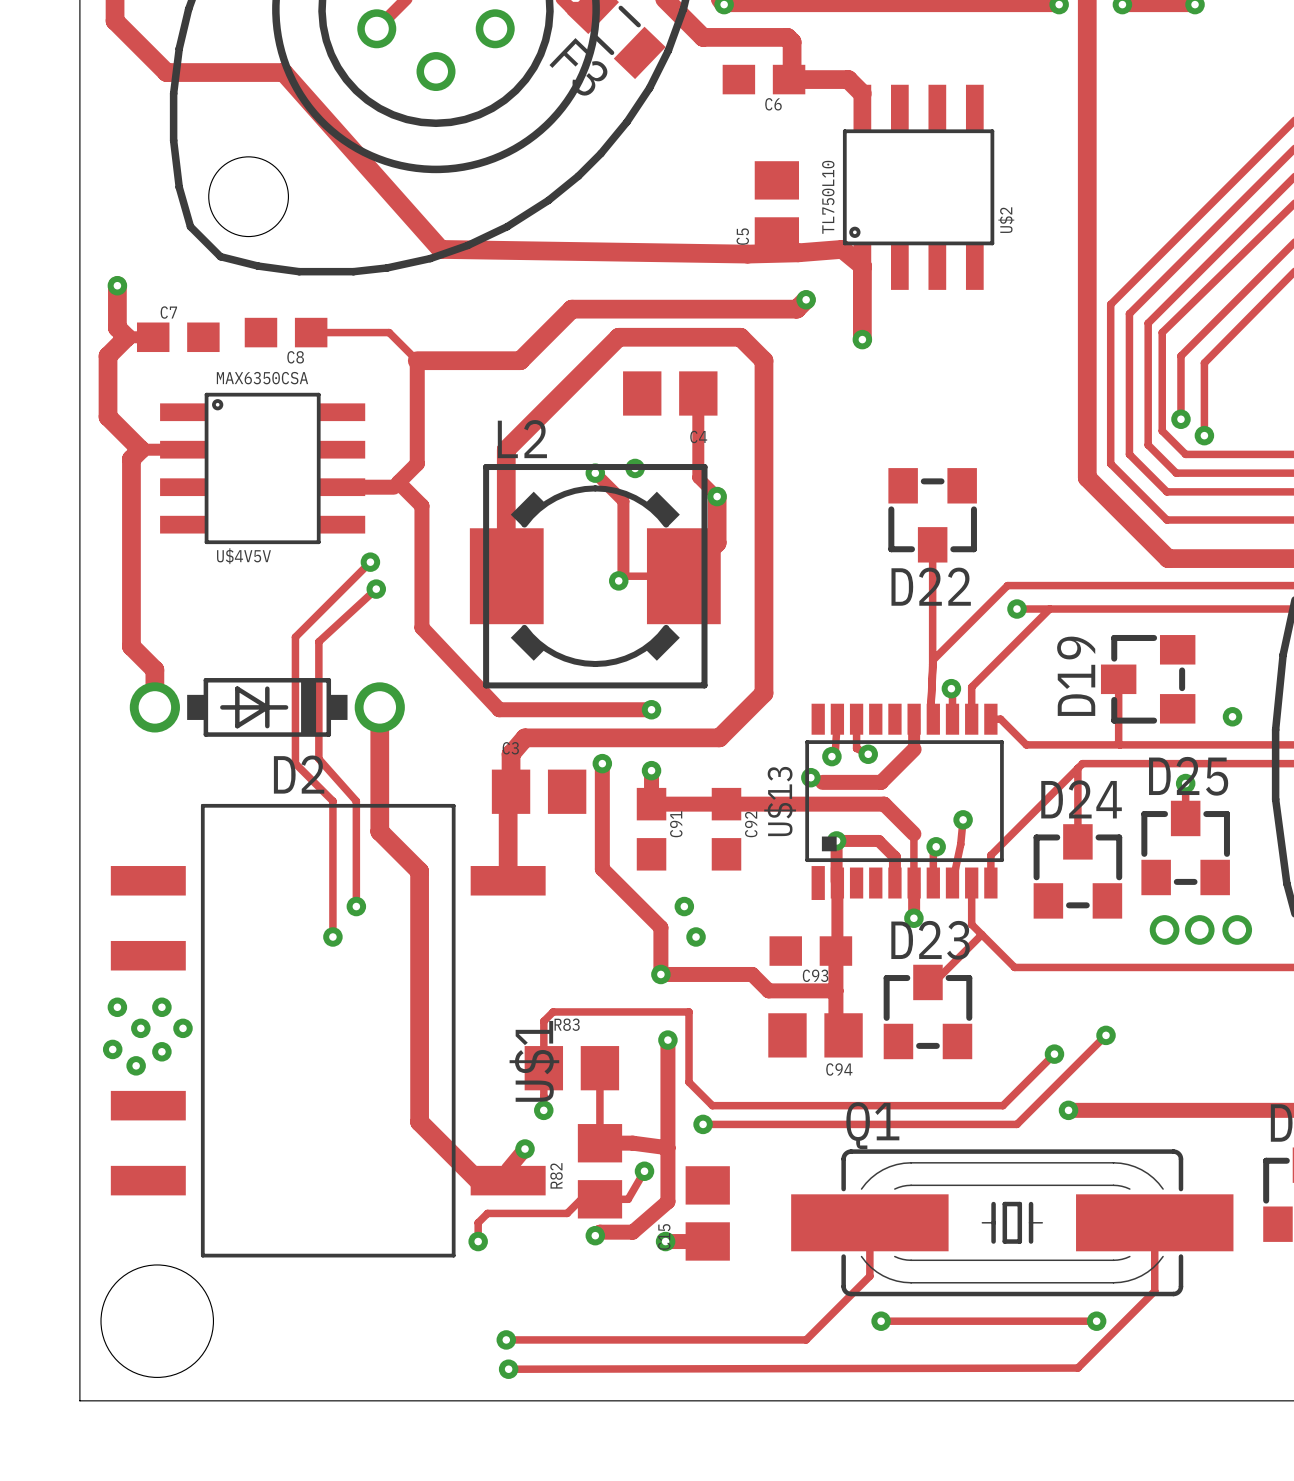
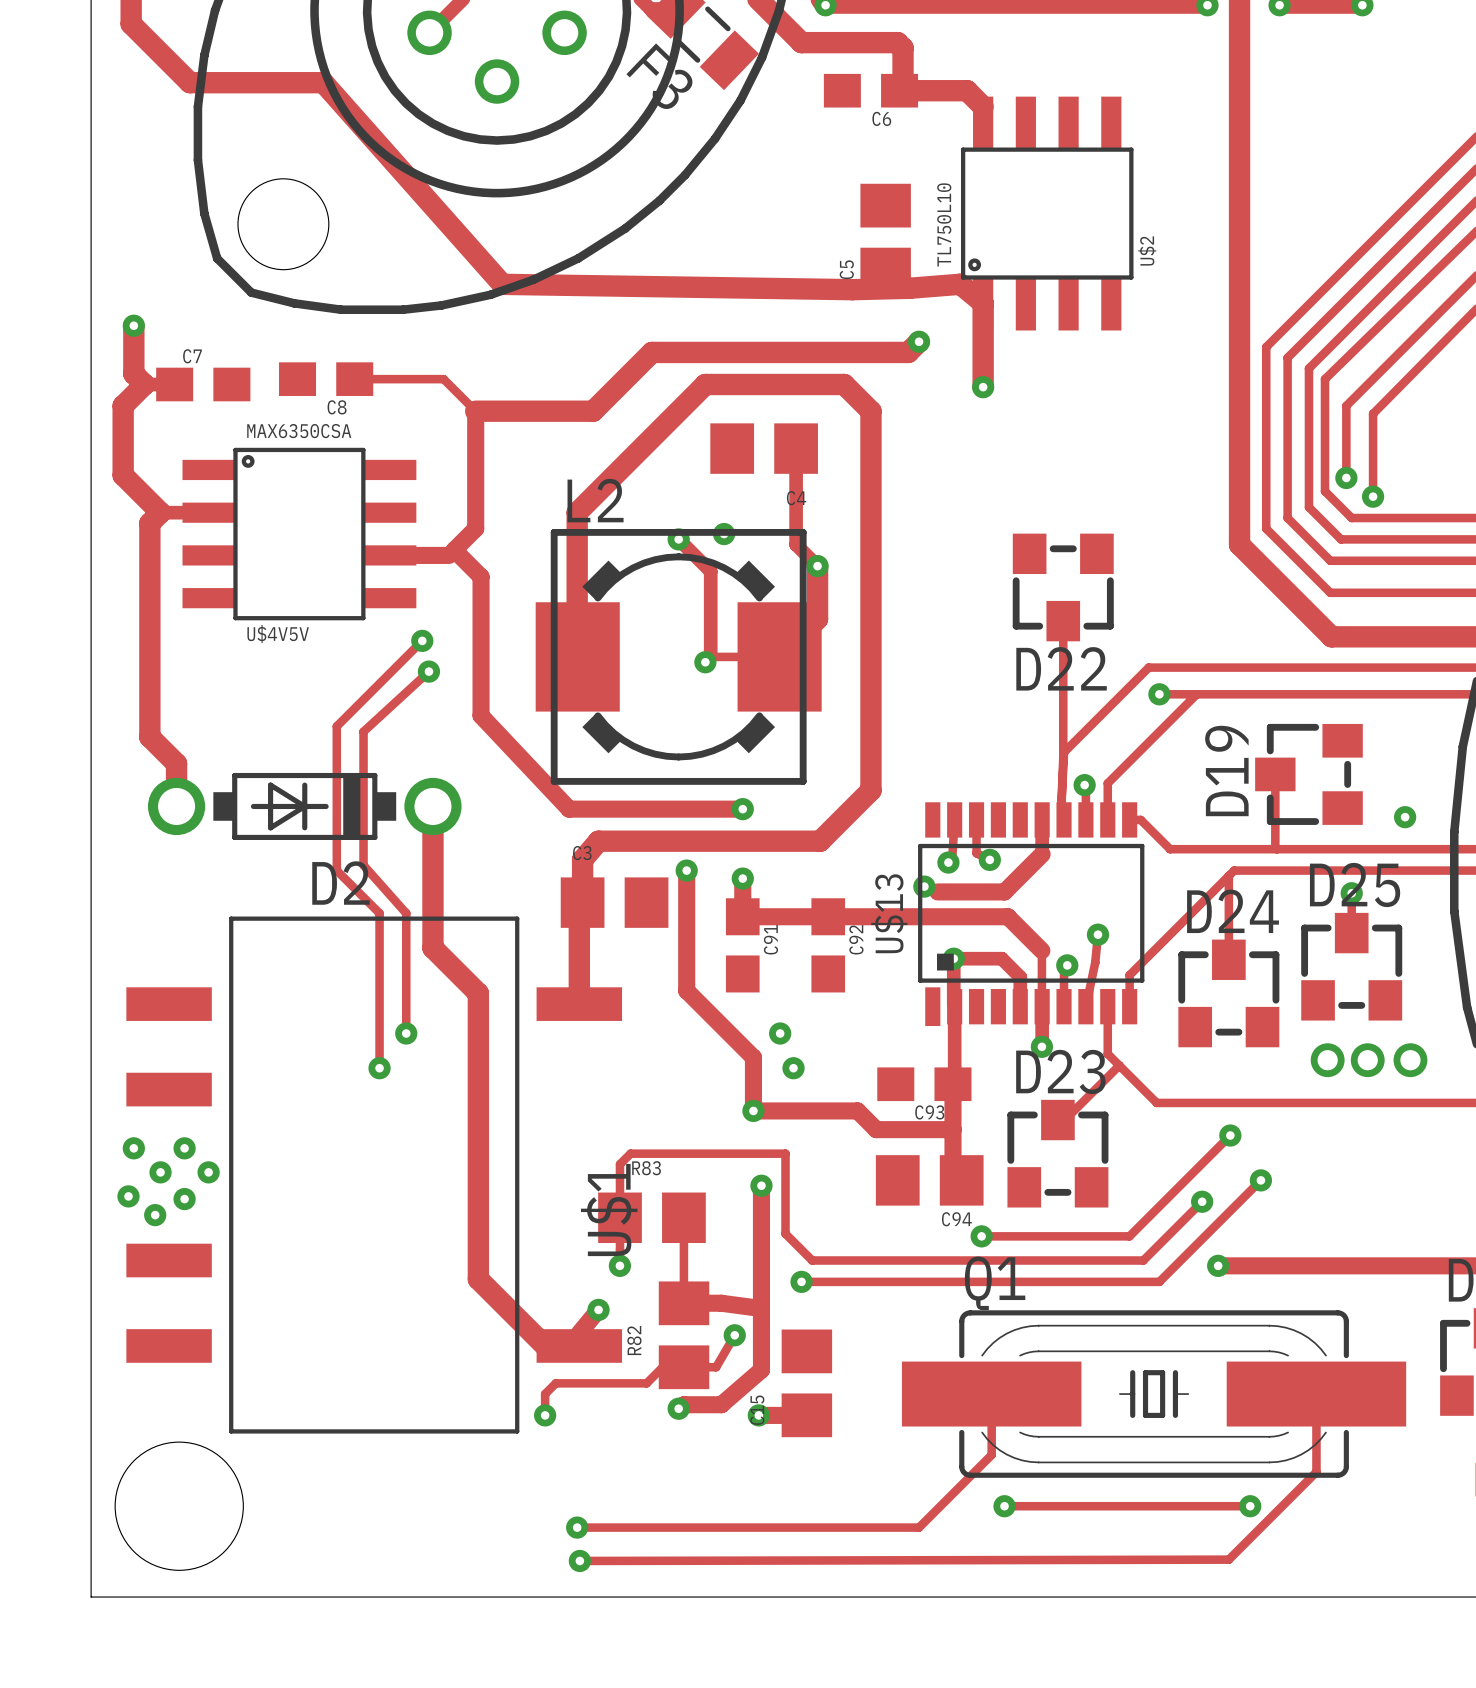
track: none -> (1230, 1135) (1129, 1236) (981, 1236)
via: none -> (1230, 1135)
via: none -> (981, 1236)

